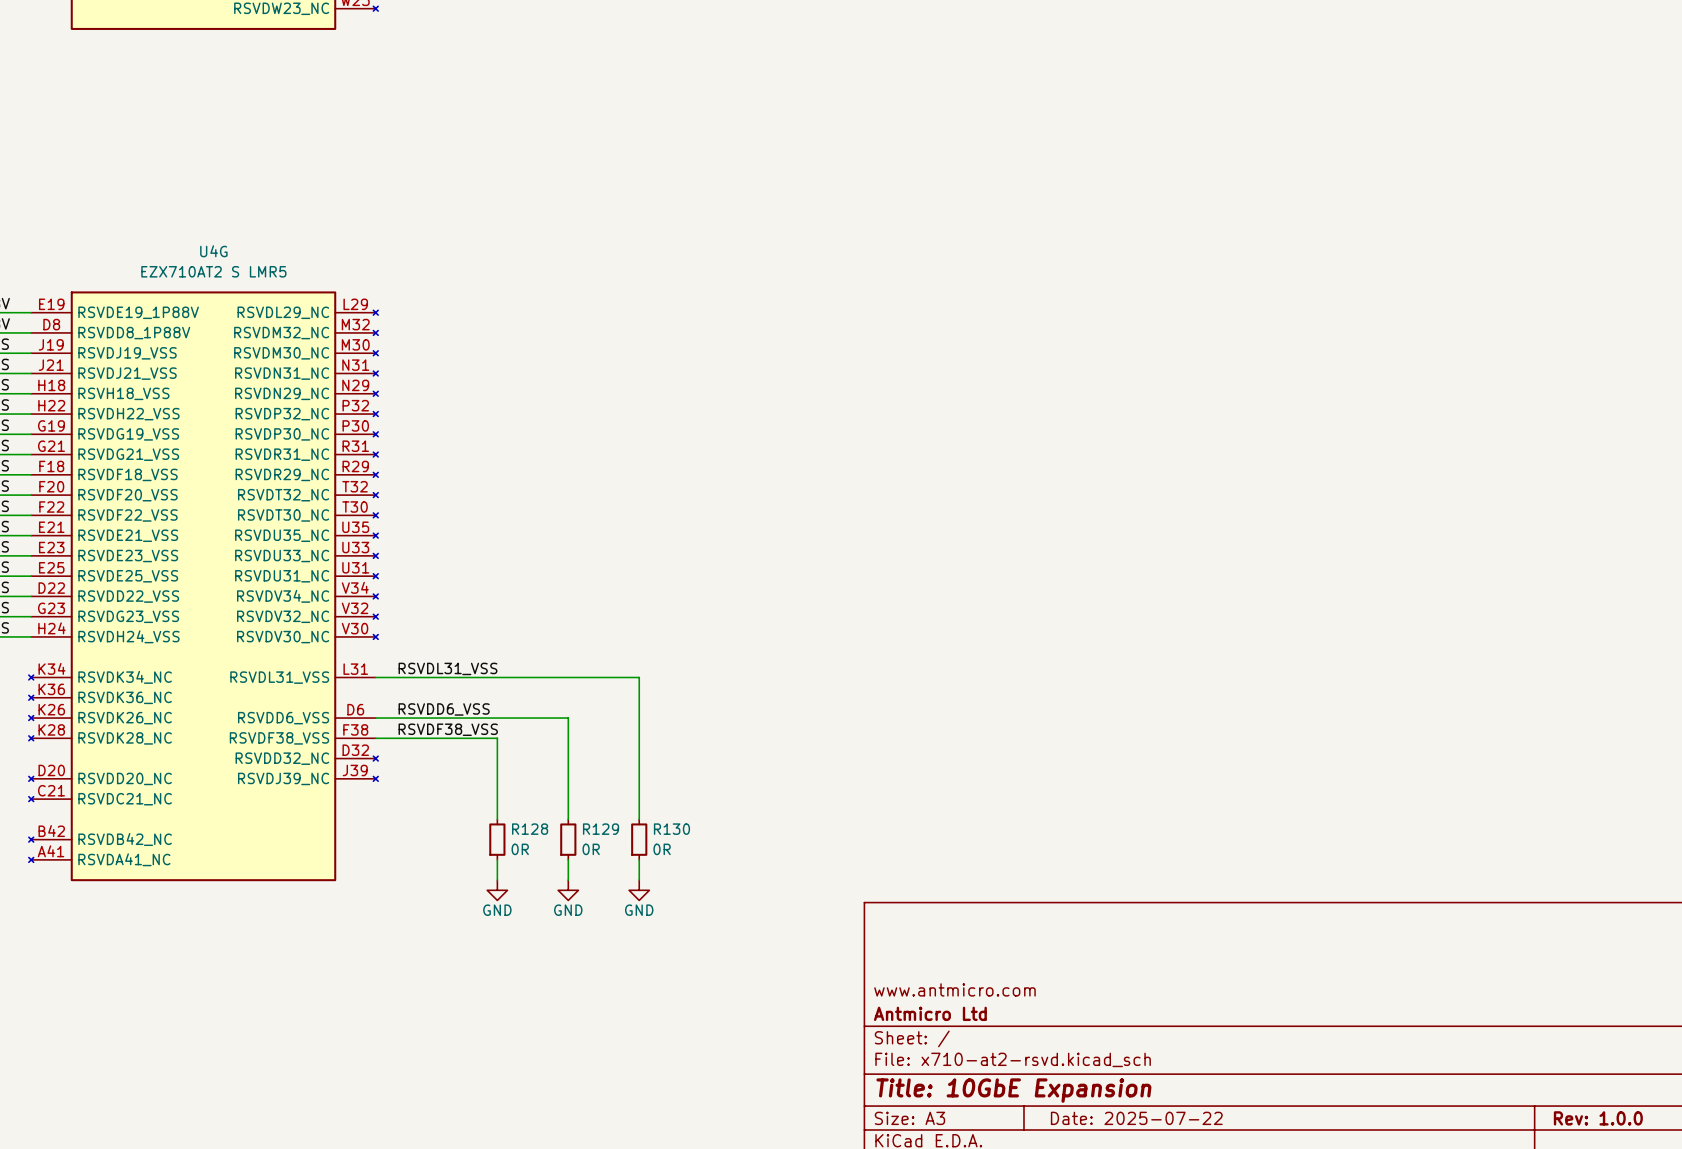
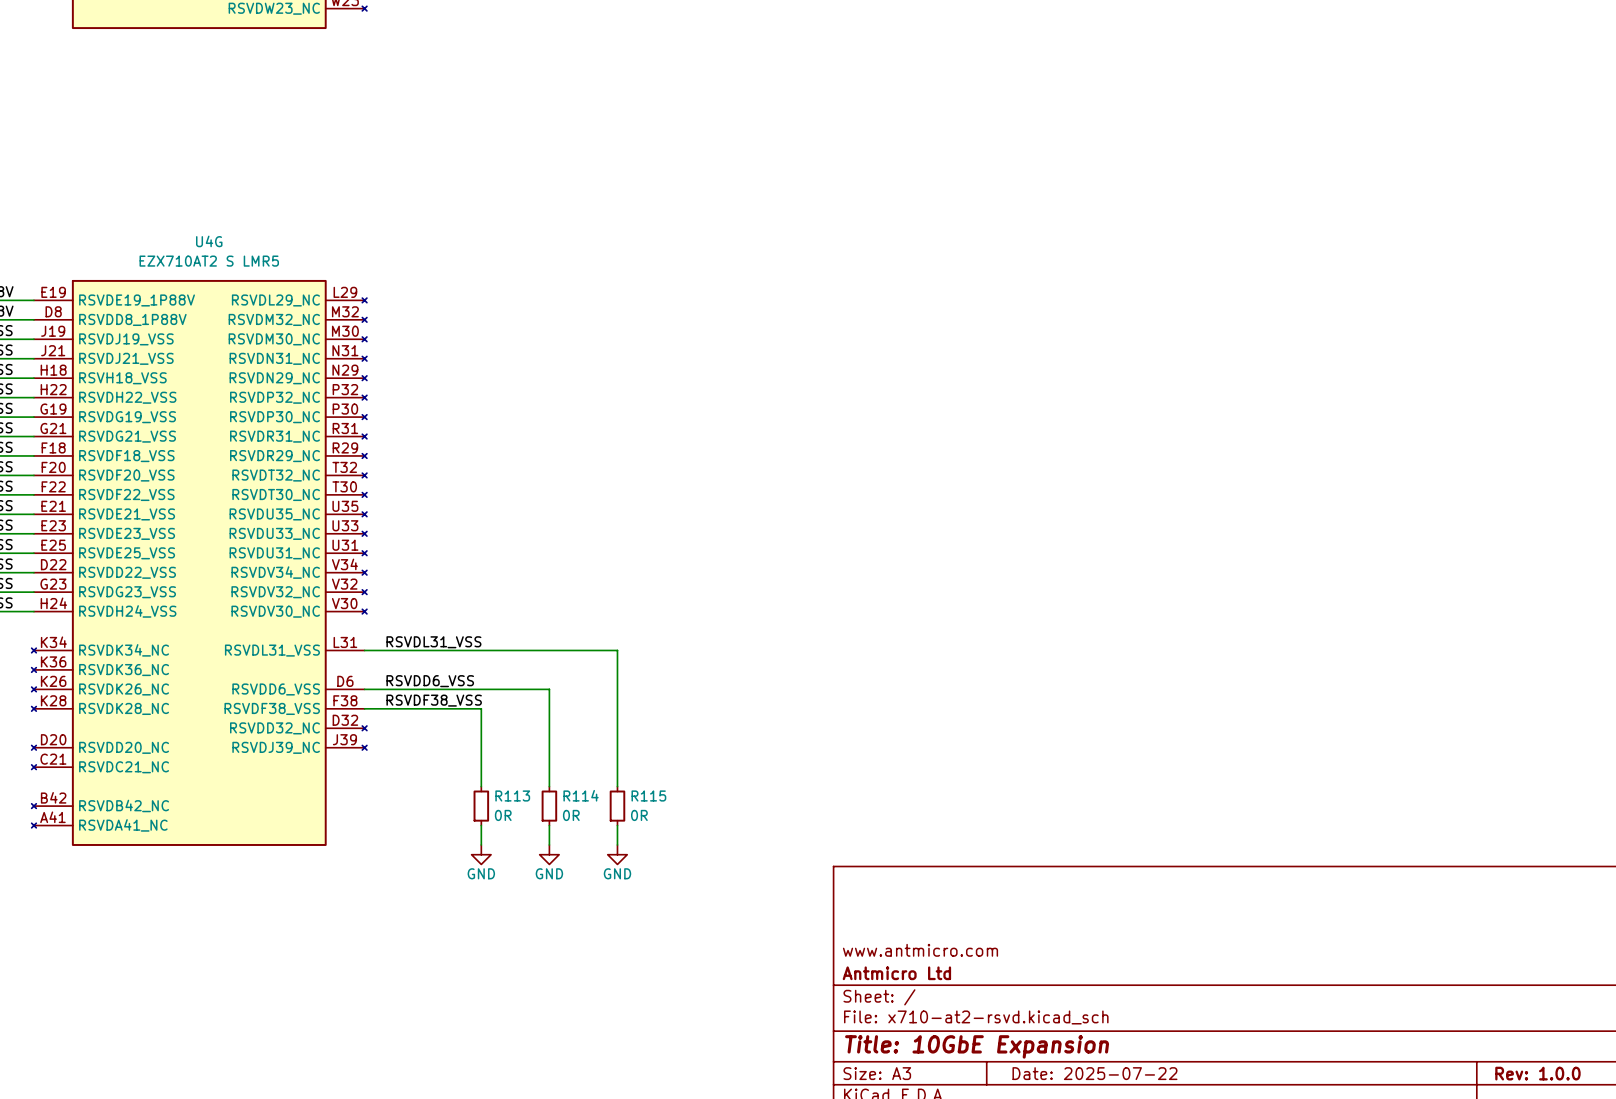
R128 name: R128 (530, 829) -> R113 (512, 795)
R129 name: R129 (601, 829) -> R114 (581, 795)
R130 name: R130 (671, 829) -> R115 (648, 795)

